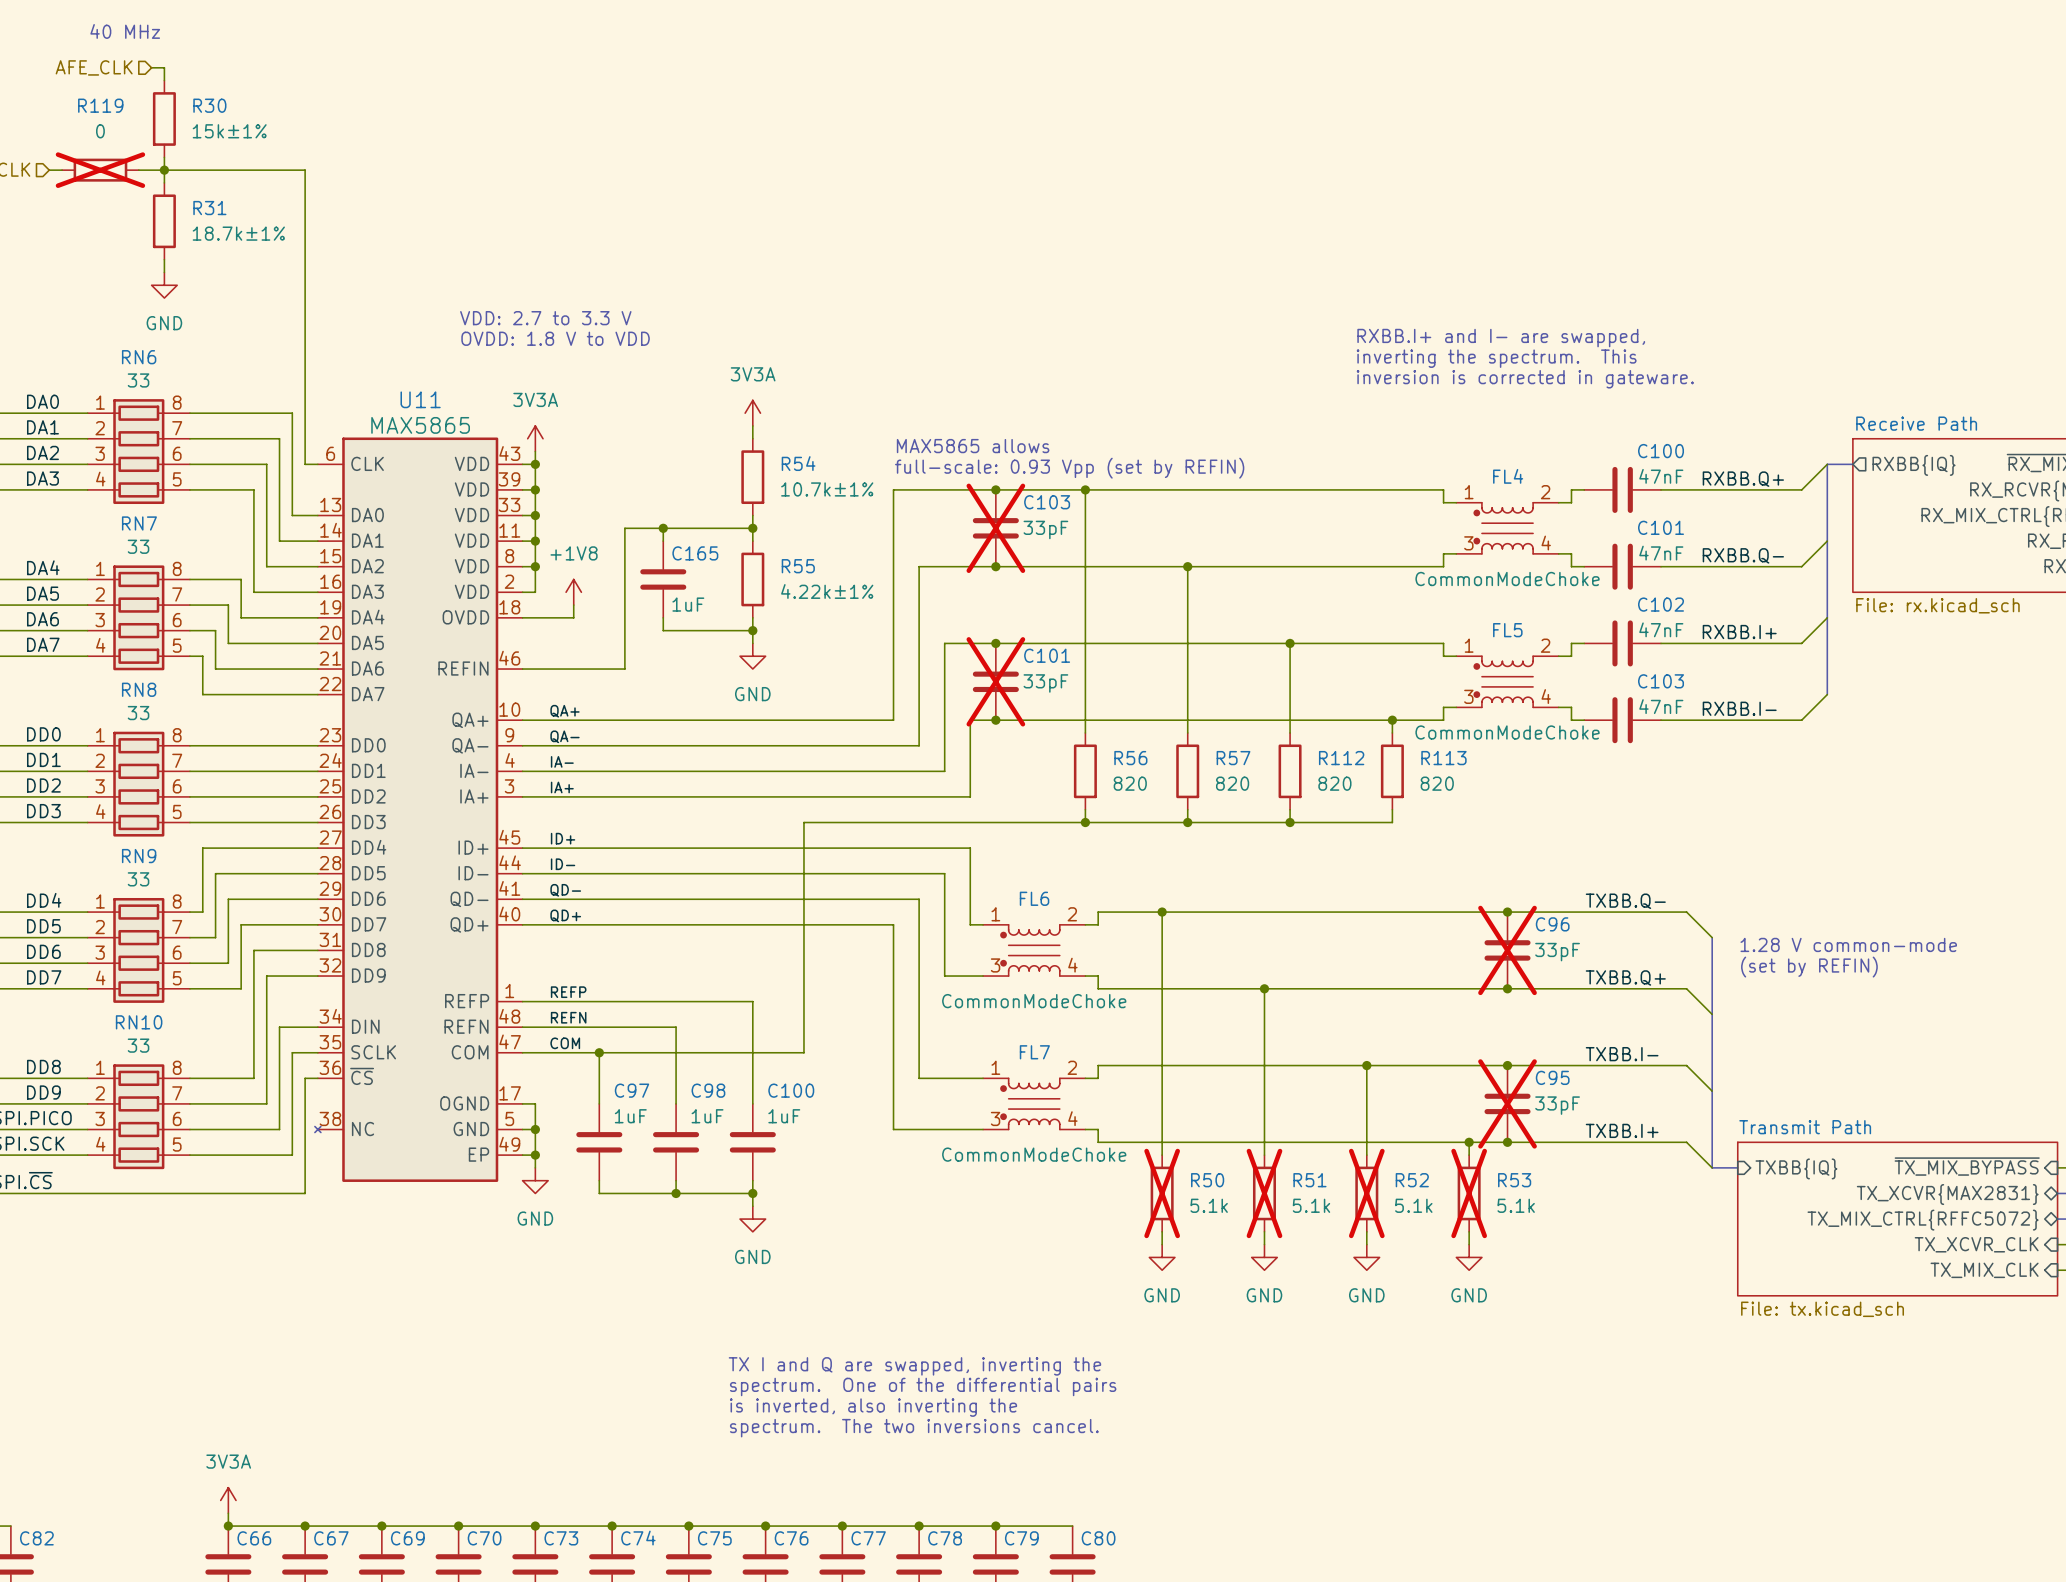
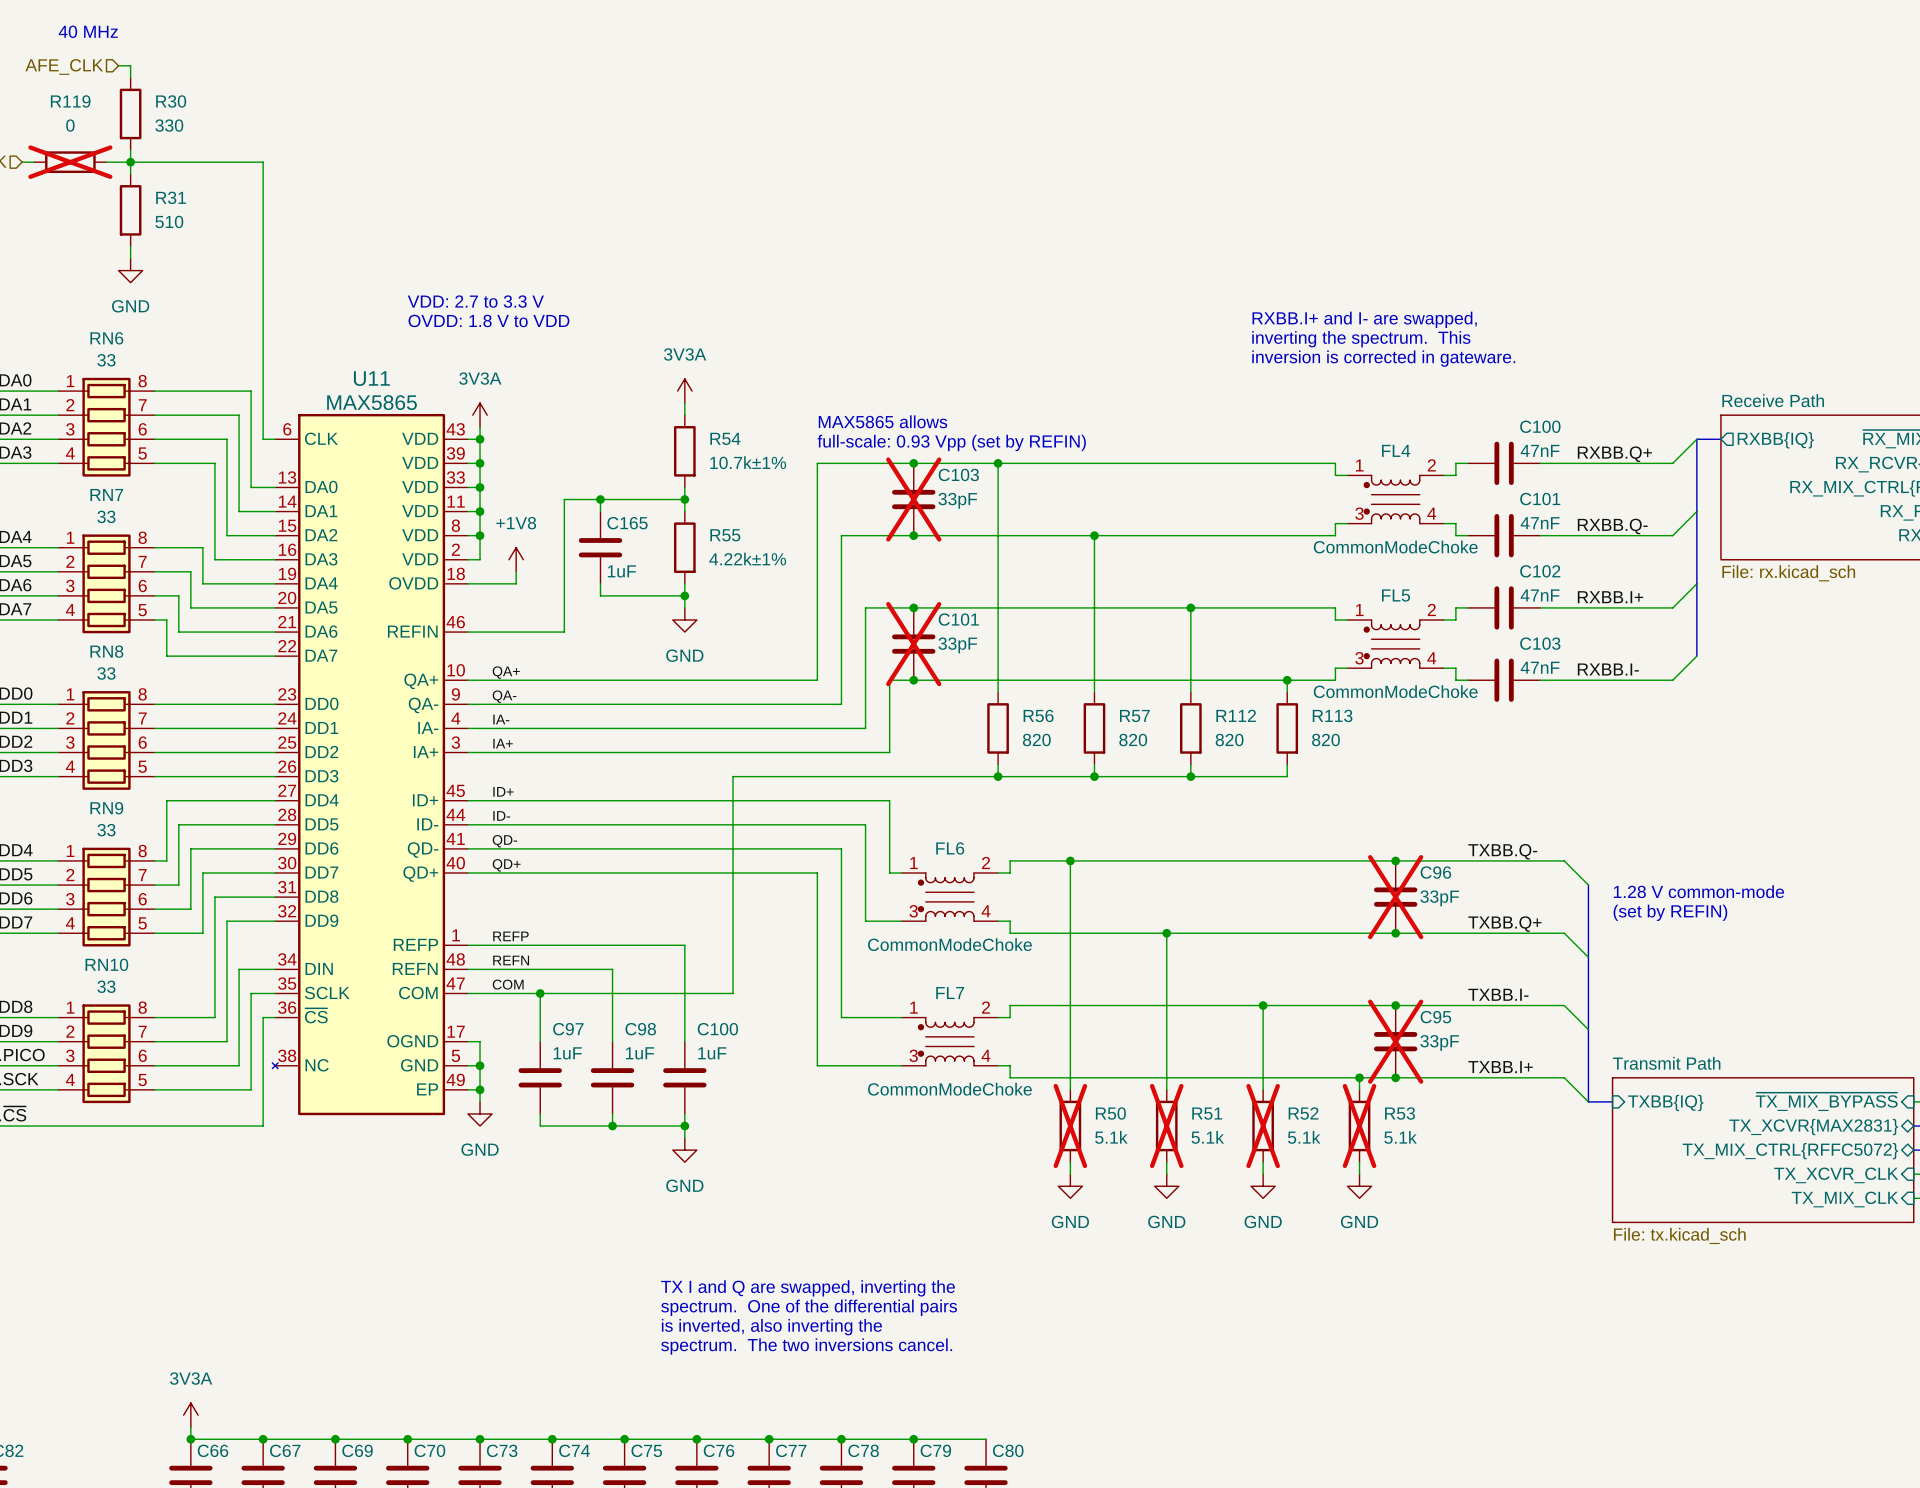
R30 value: 15k±1% (229, 131) -> 330 (169, 125)
R31 value: 18.7k±1% (238, 233) -> 510 (169, 221)

